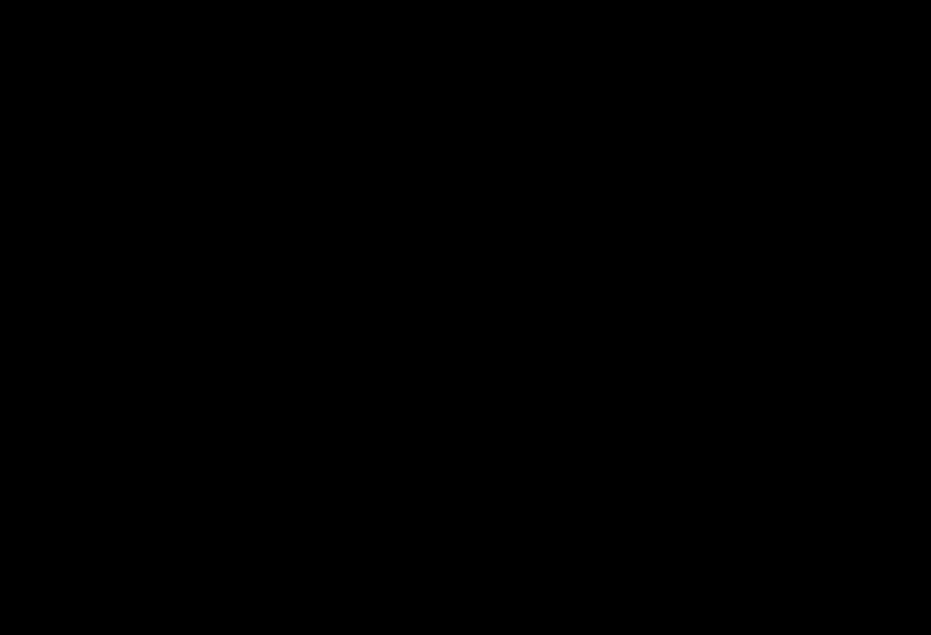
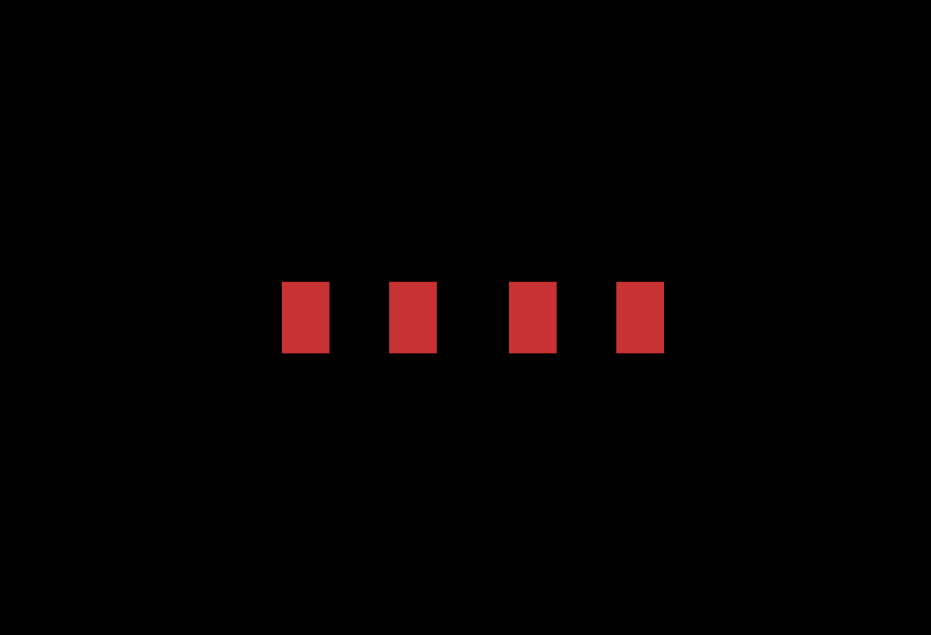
part: none -> (359, 317)
part: none -> (586, 317)

